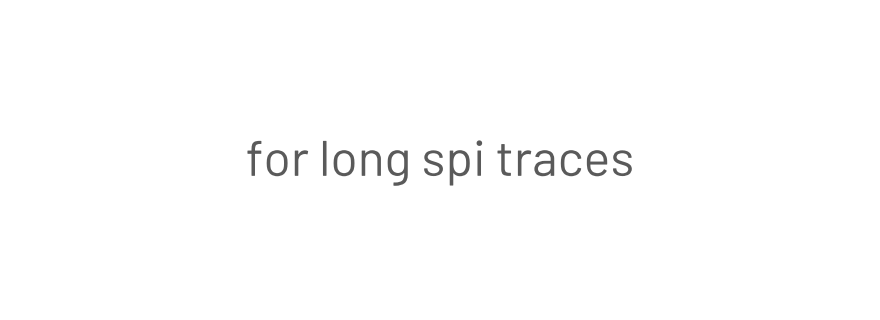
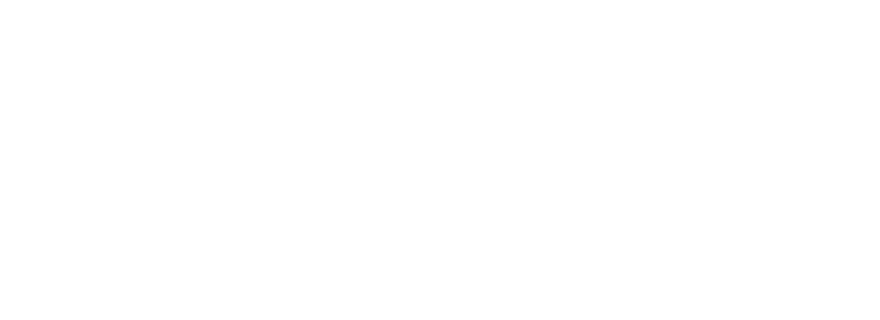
text: for long spi traces (439, 163) -> none

